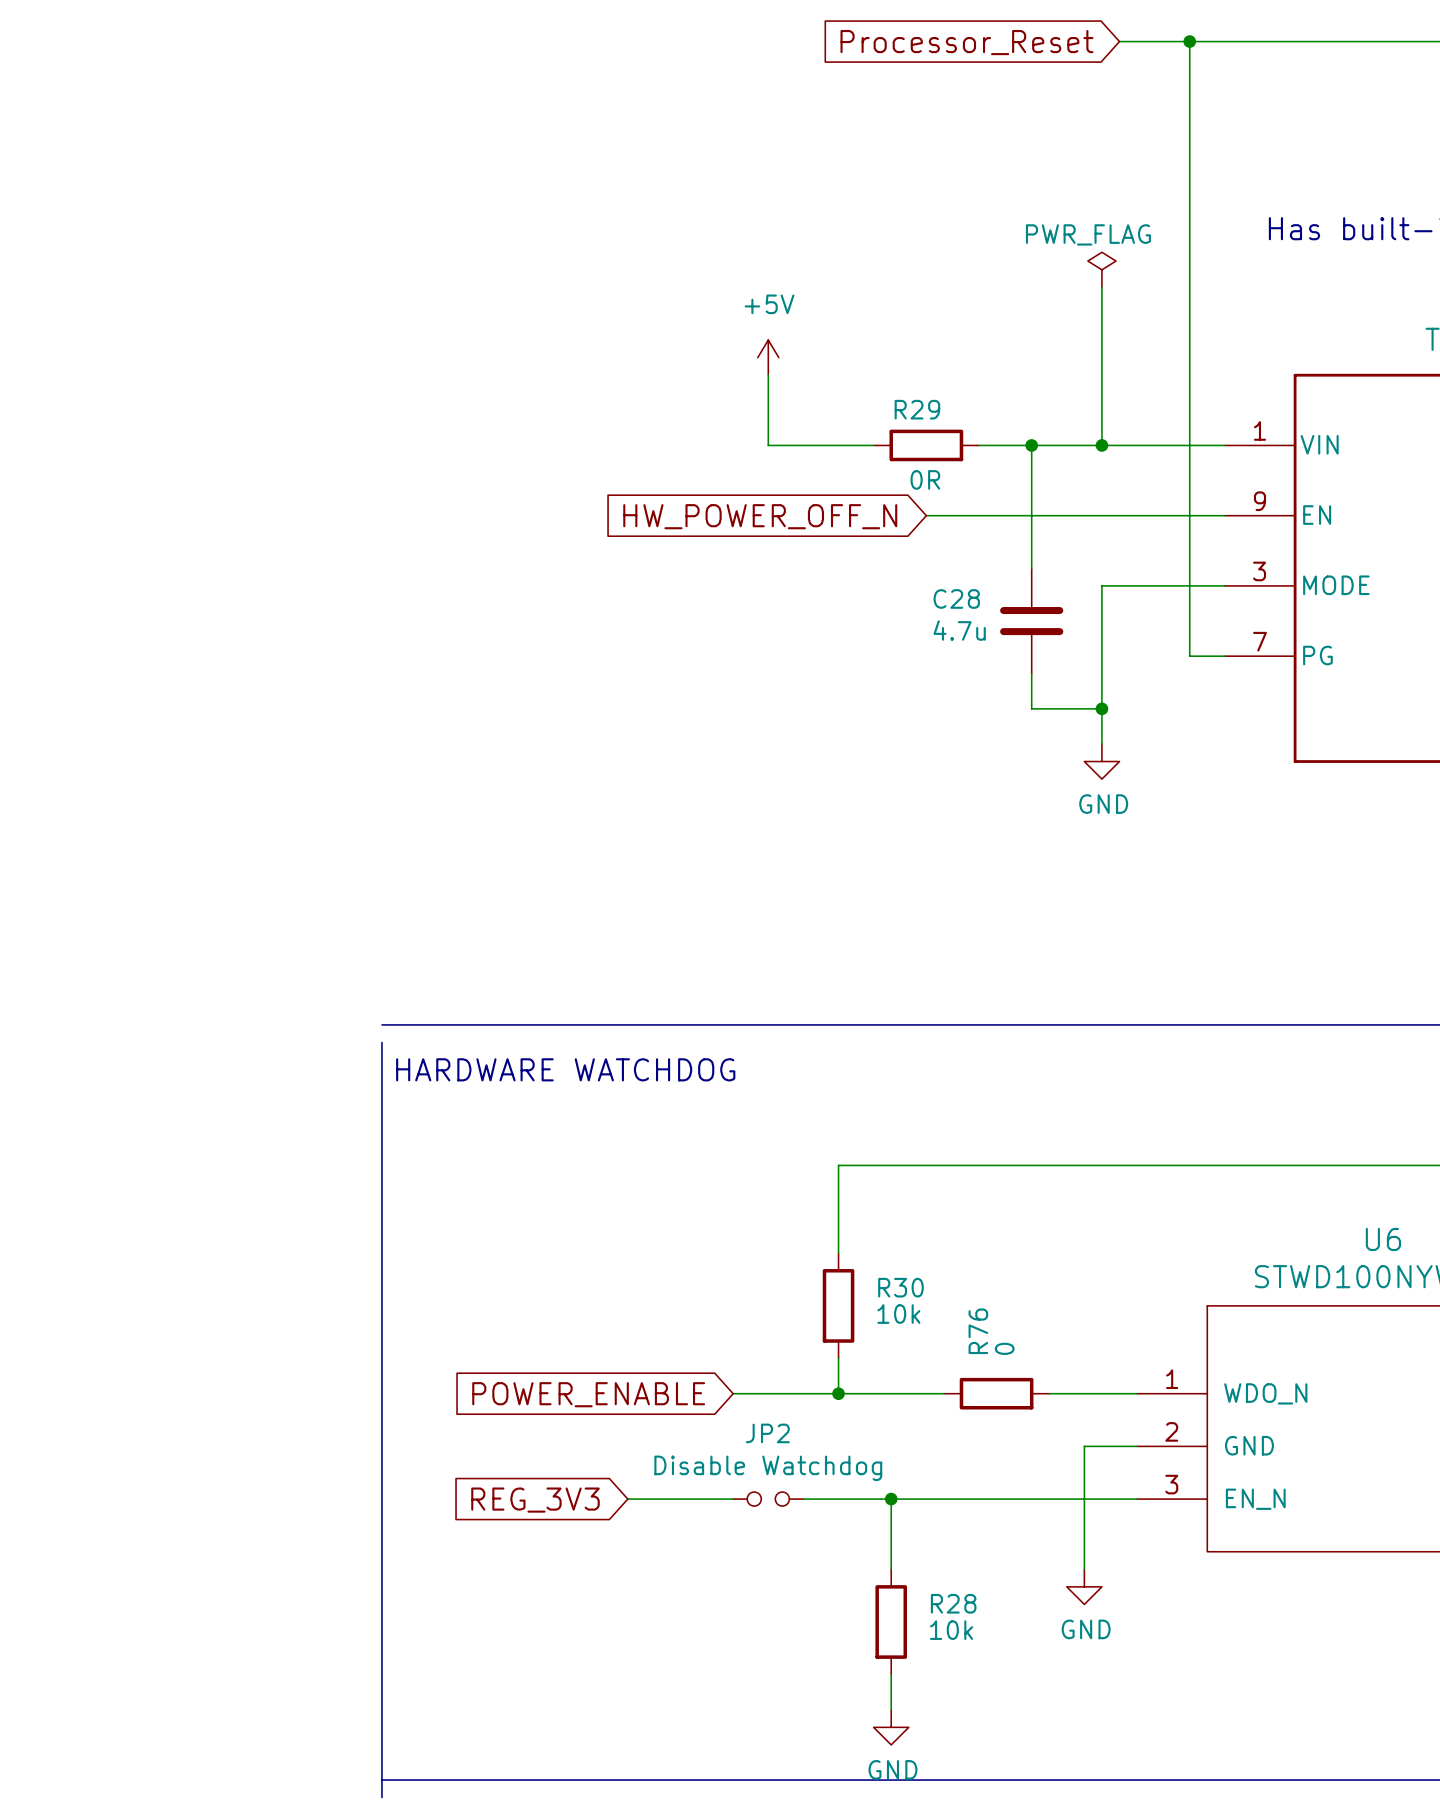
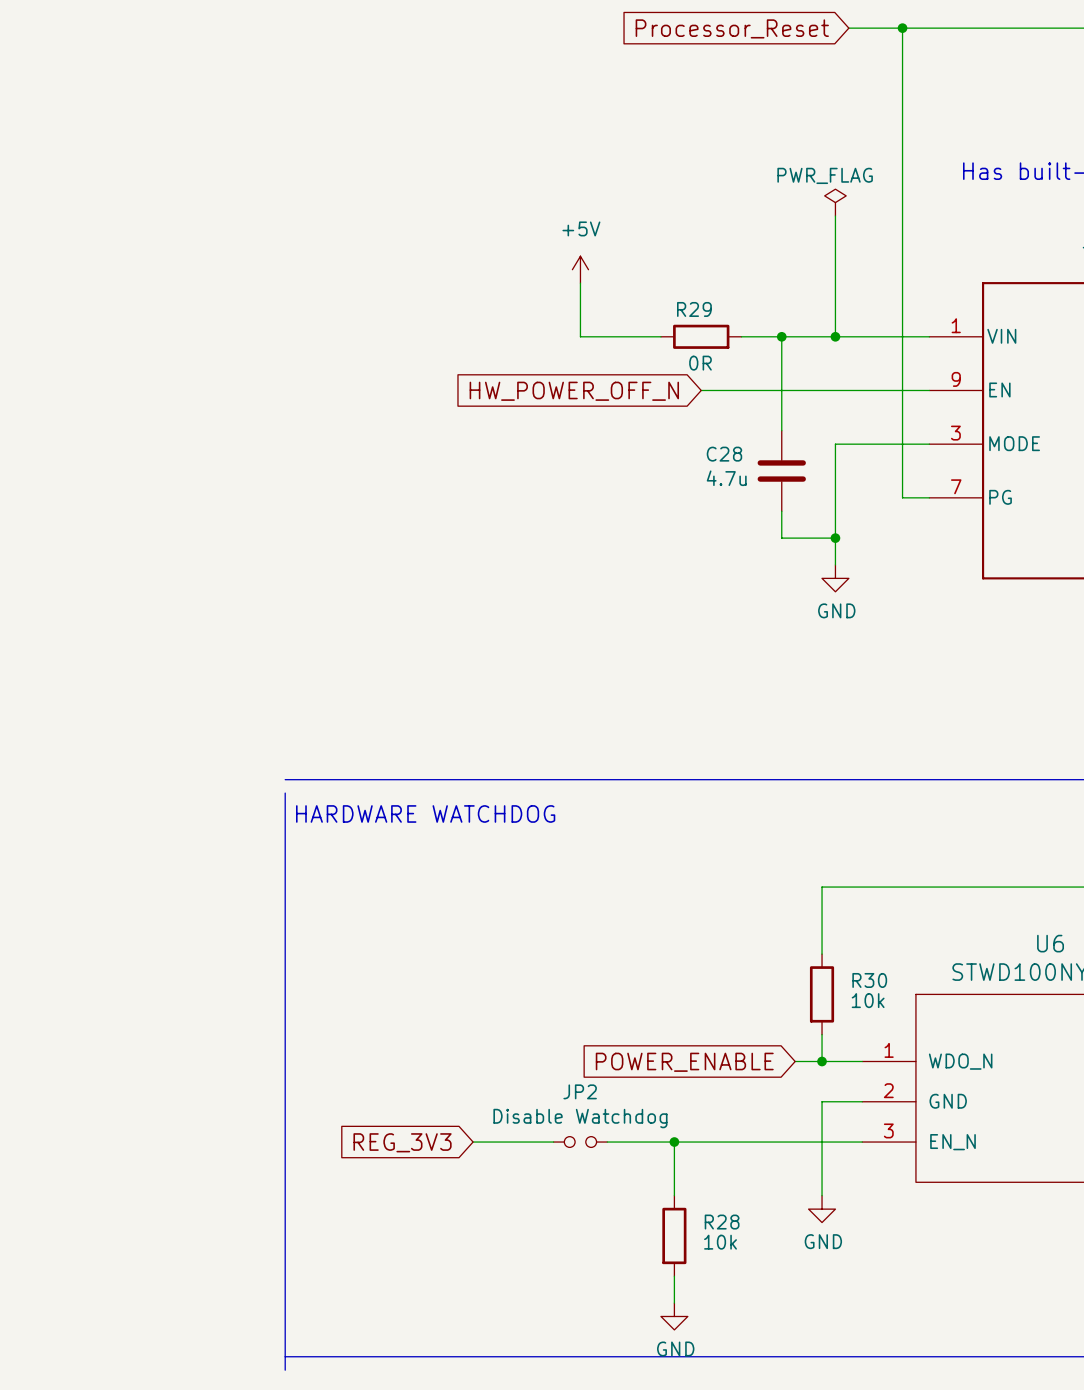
wire: (1084, 1165) (838, 1165) (838, 1253) -> (822, 887) (822, 954)
R30 position: (838, 1305) -> (822, 994)
wire: (838, 1358) (838, 1393) -> (822, 1034) (822, 1061)
wire: (733, 1393) (943, 1393) -> none
junction: (838, 1393) -> none
R76: 0 (996, 1393) -> none
junction: none -> (822, 1061)
global label position: POWER_ENABLE (588, 1394) -> POWER_ENABLE (684, 1062)

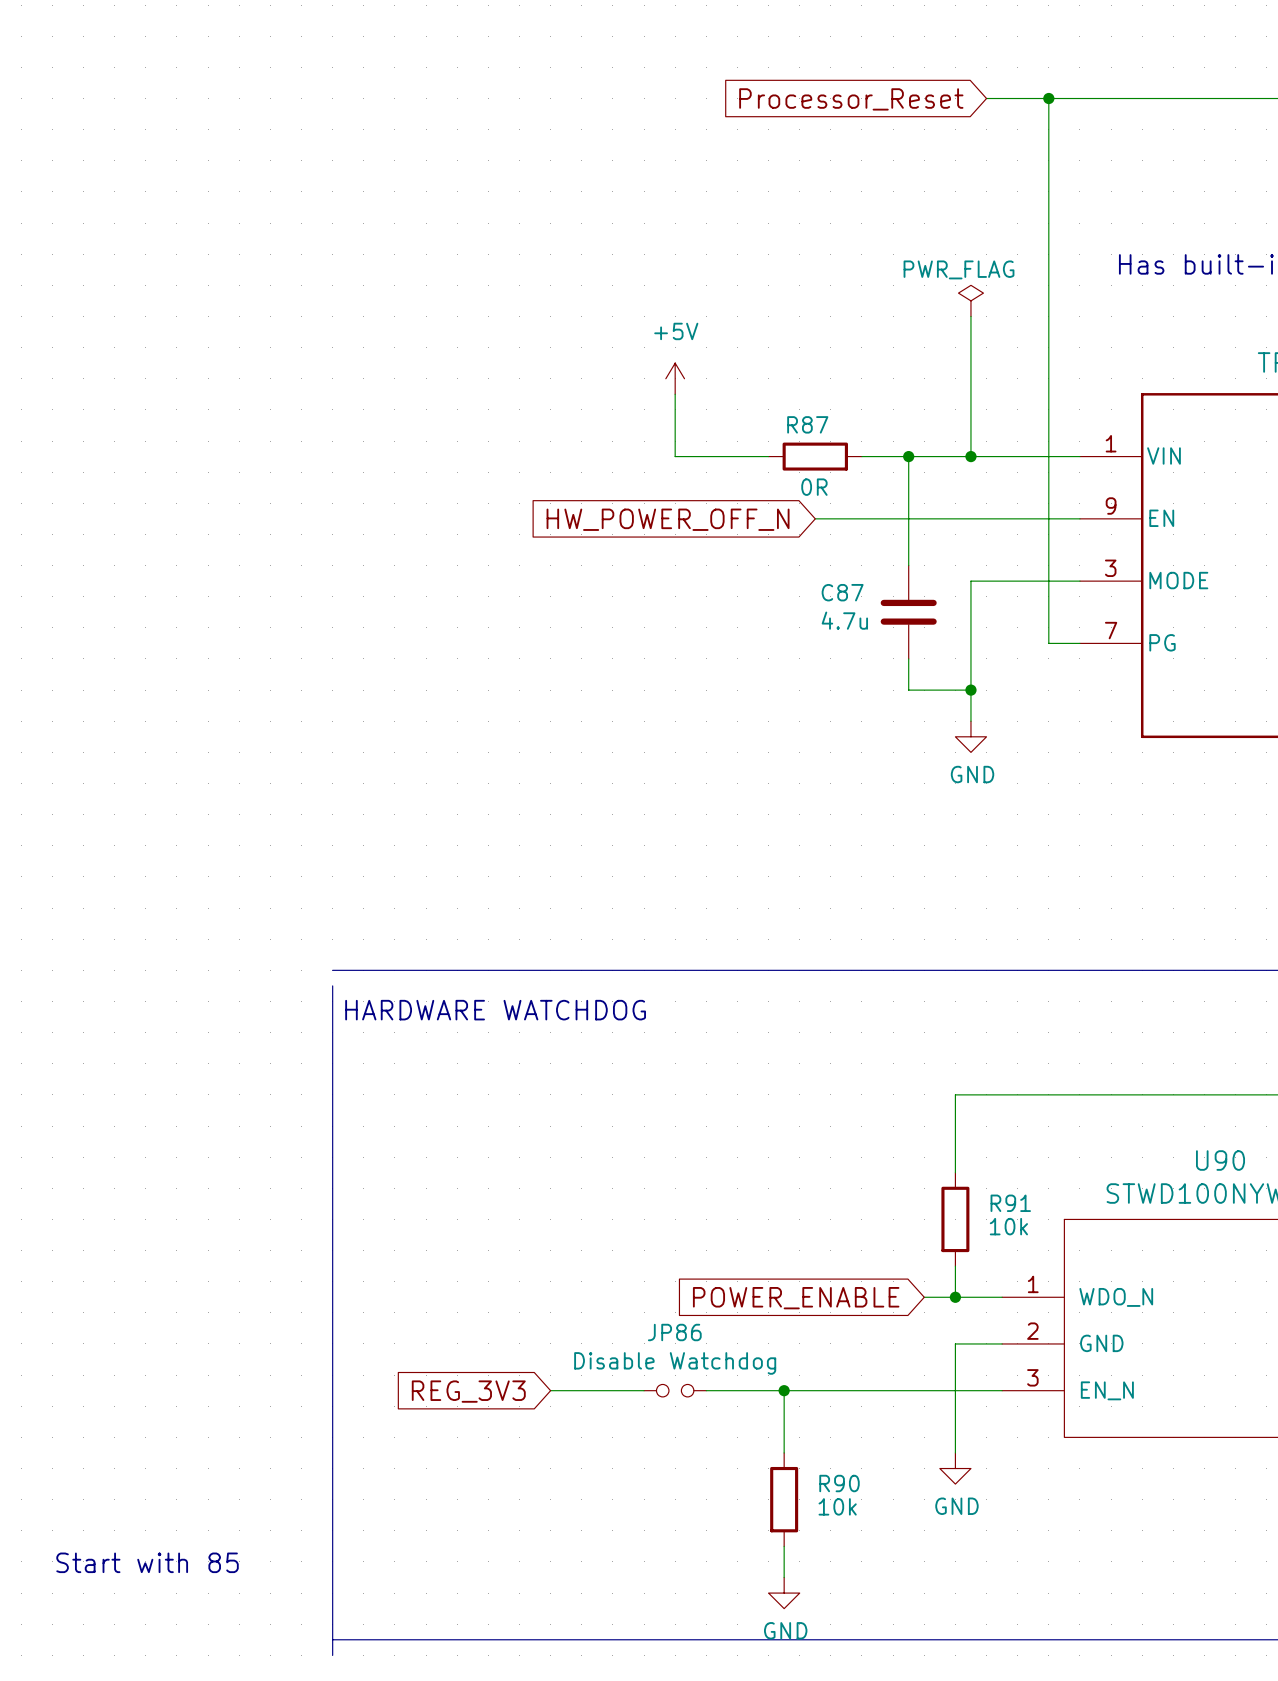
R29 name: R29 (694, 309) -> R87 (807, 424)
C28 name: C28 (724, 454) -> C87 (842, 592)
U6 name: U6 (1050, 943) -> U90 (1220, 1160)
R30 name: R30 (869, 980) -> R91 (1010, 1203)
JP2 name: JP2 (580, 1091) -> JP86 (674, 1332)
R28 name: R28 (722, 1222) -> R90 (839, 1483)
text: none -> Start with 85 (147, 1562)

